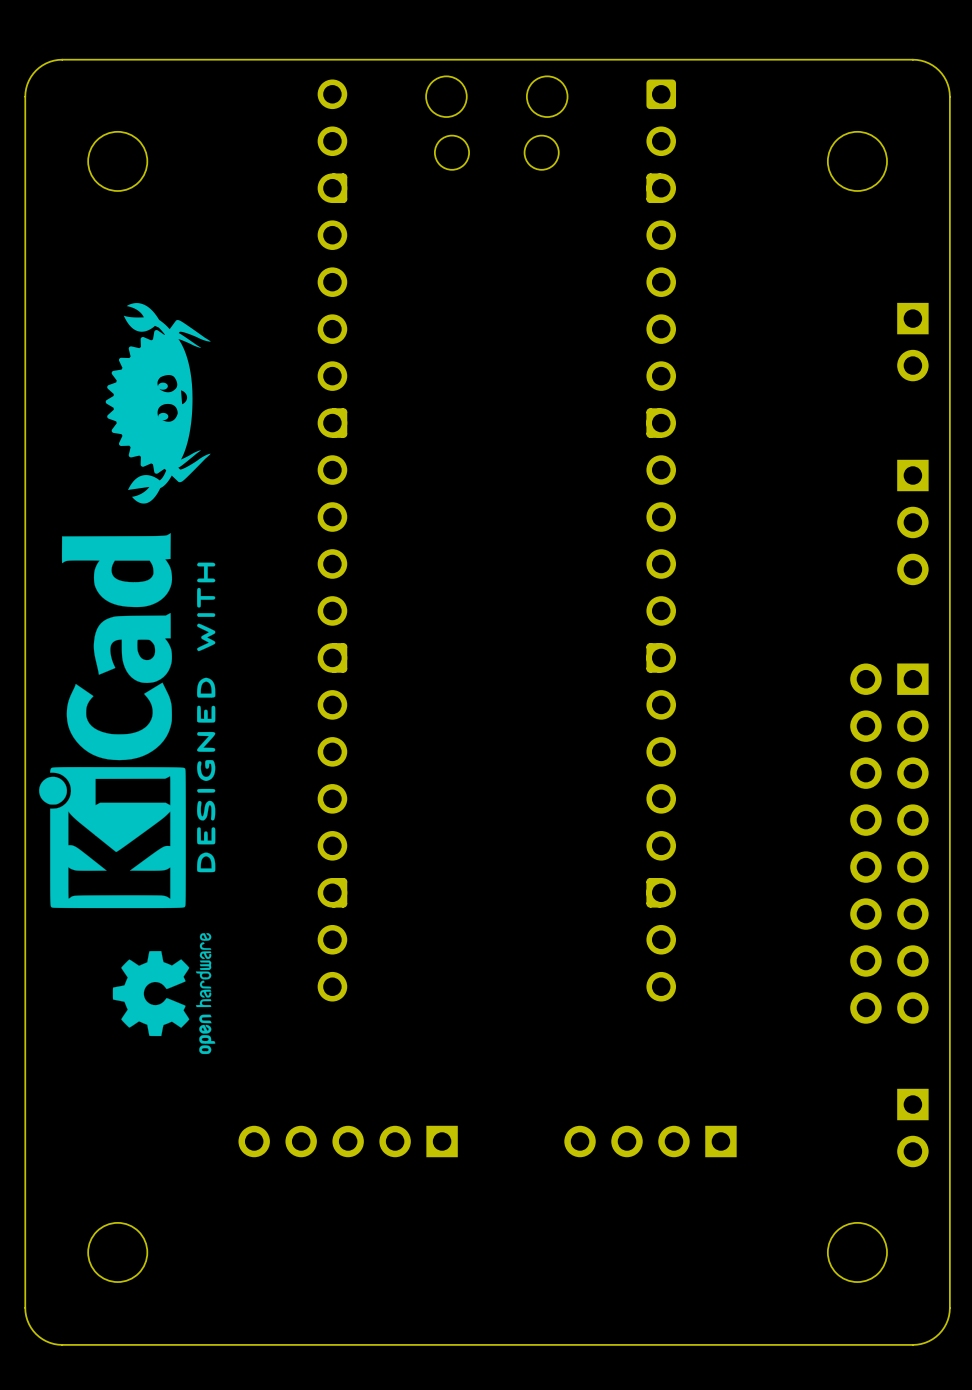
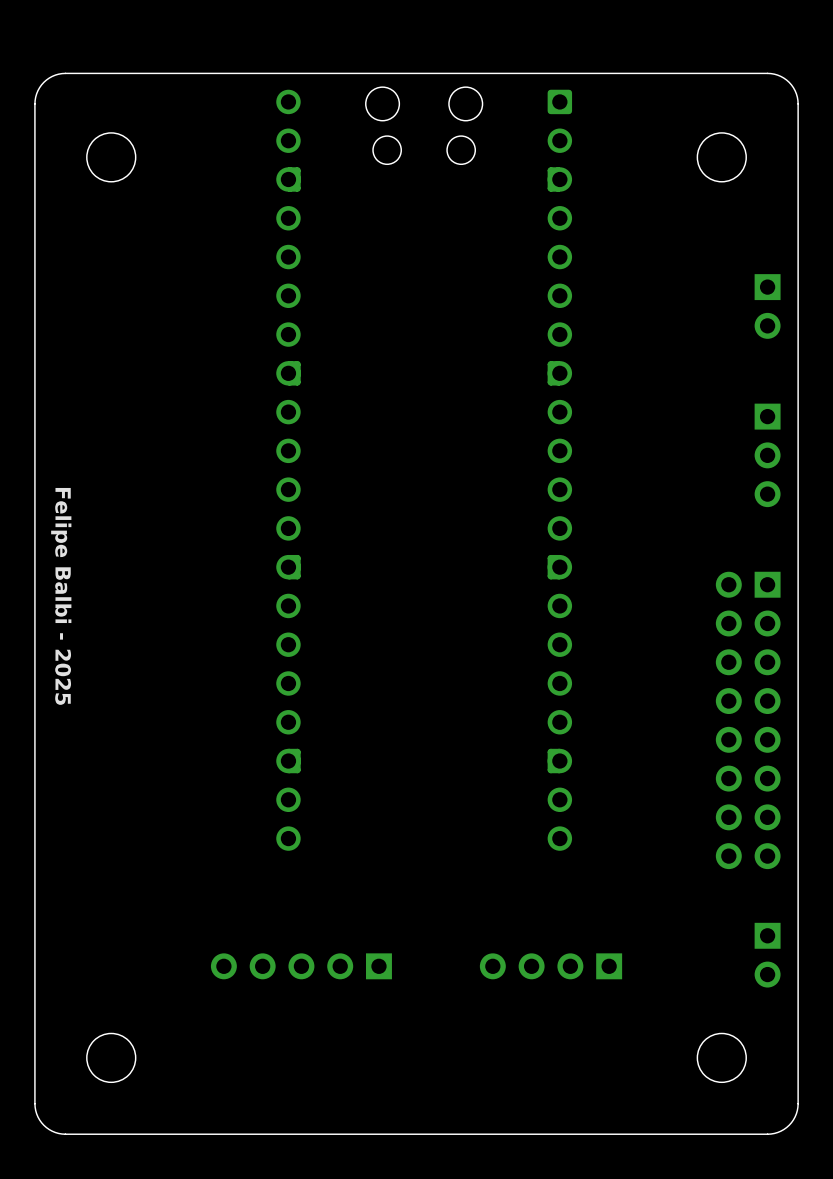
drawing: [105, 303, 211, 504] -> none
drawing: [39, 533, 216, 909] -> none
text: none -> Felipe Balbi - 2025 (61, 596)
drawing: [112, 933, 216, 1055] -> none

